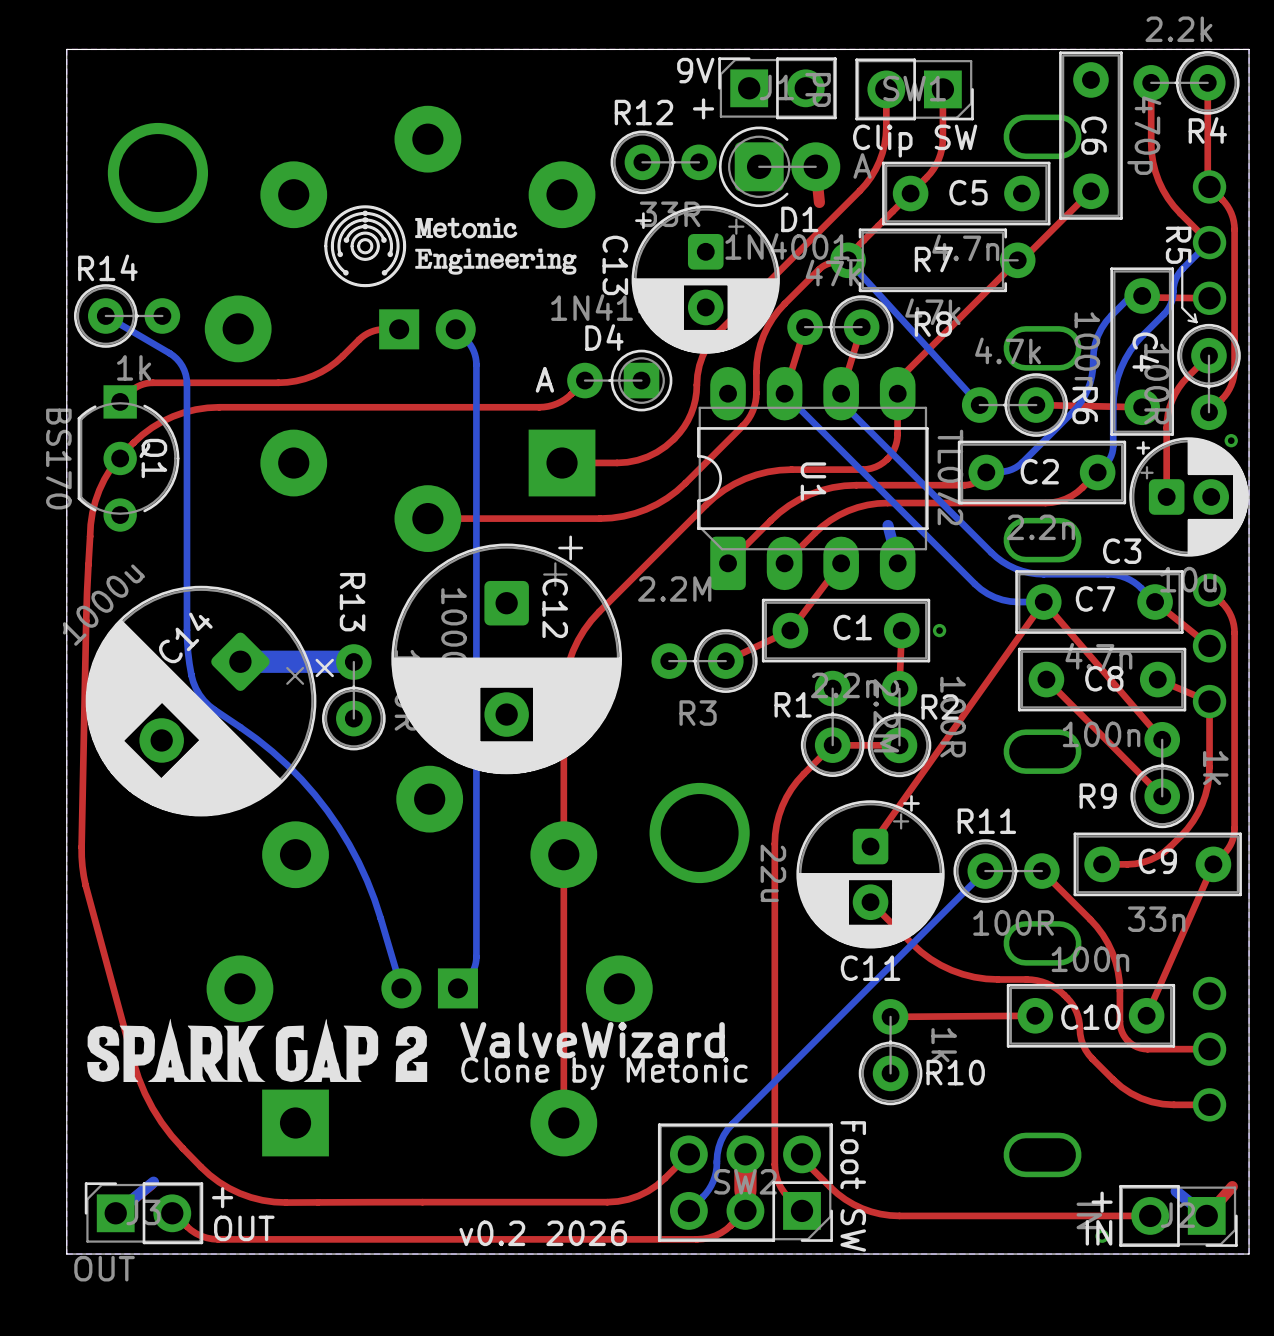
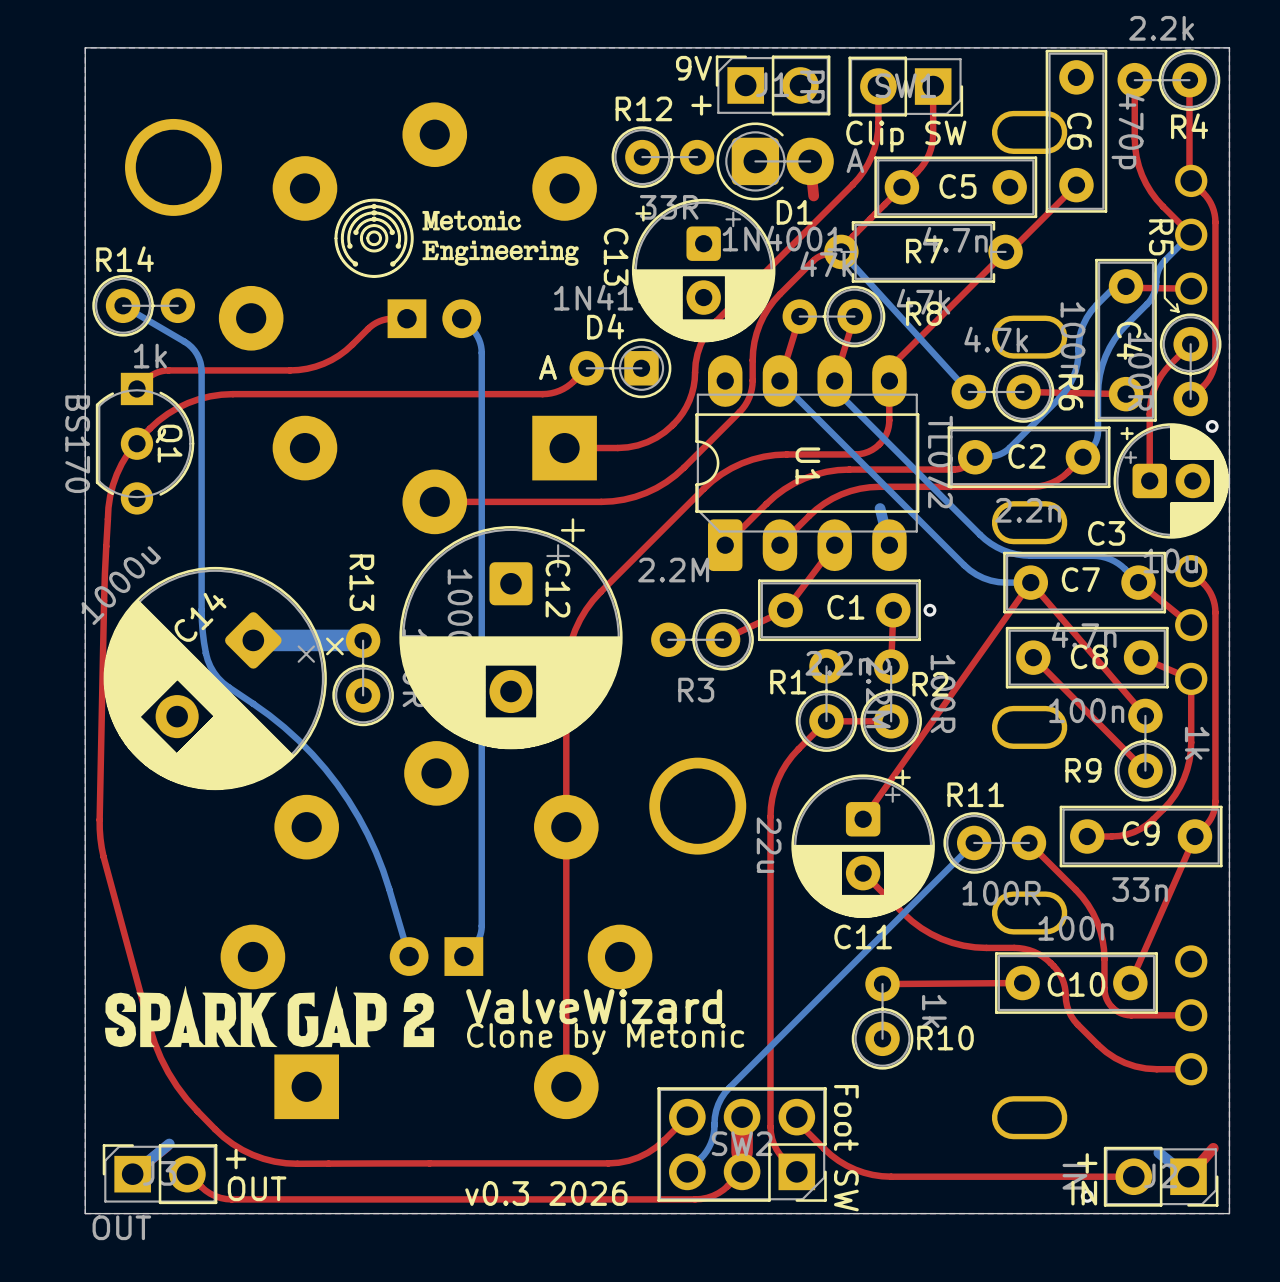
text: v0.2 2026 (543, 1233) -> v0.3 2026 (546, 1193)

